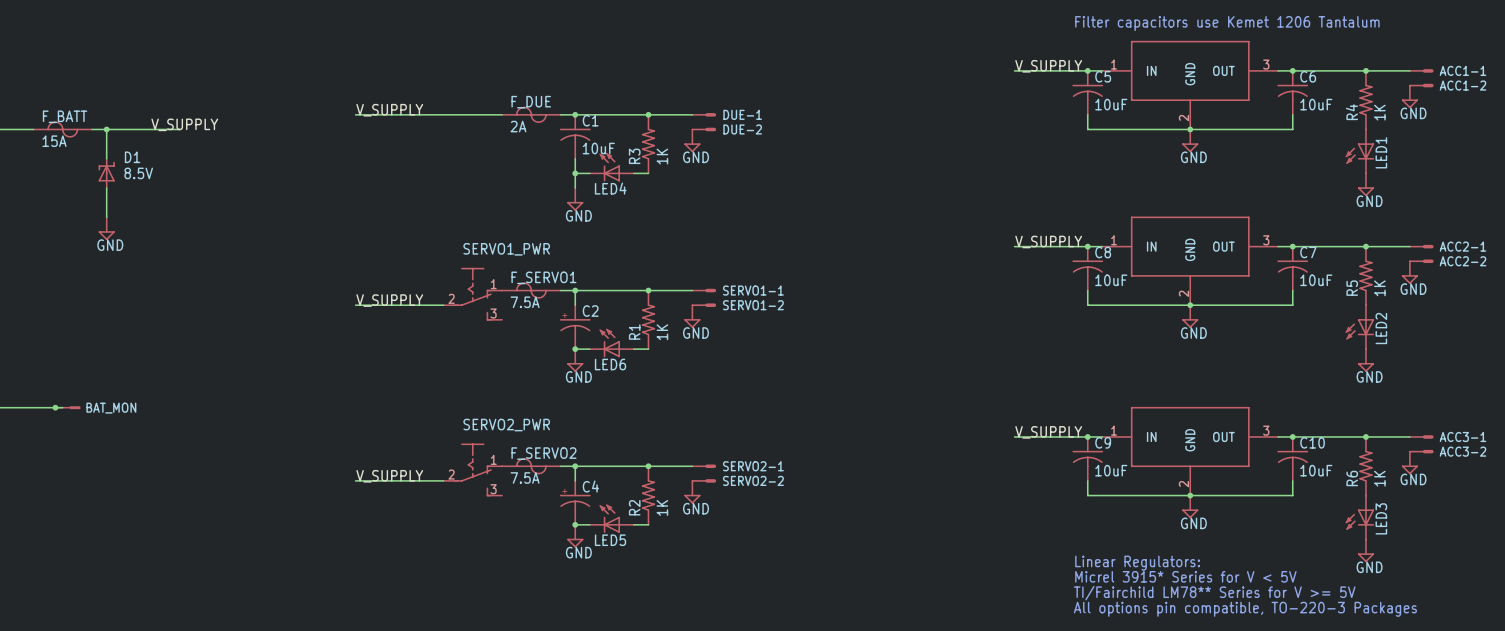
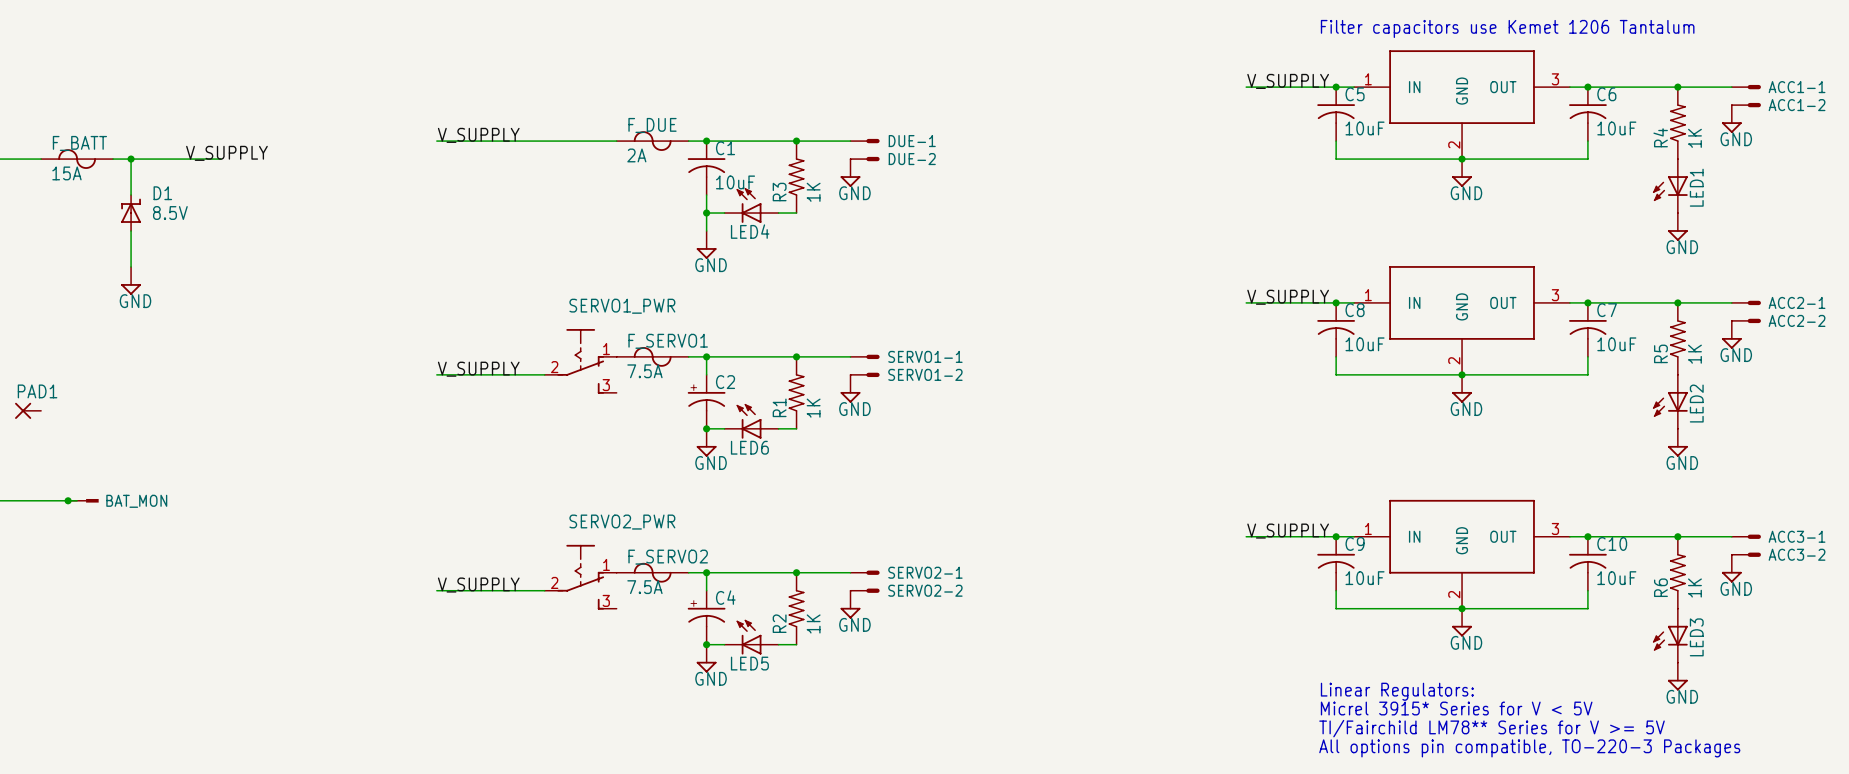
PAD1: none -> (28, 410)

